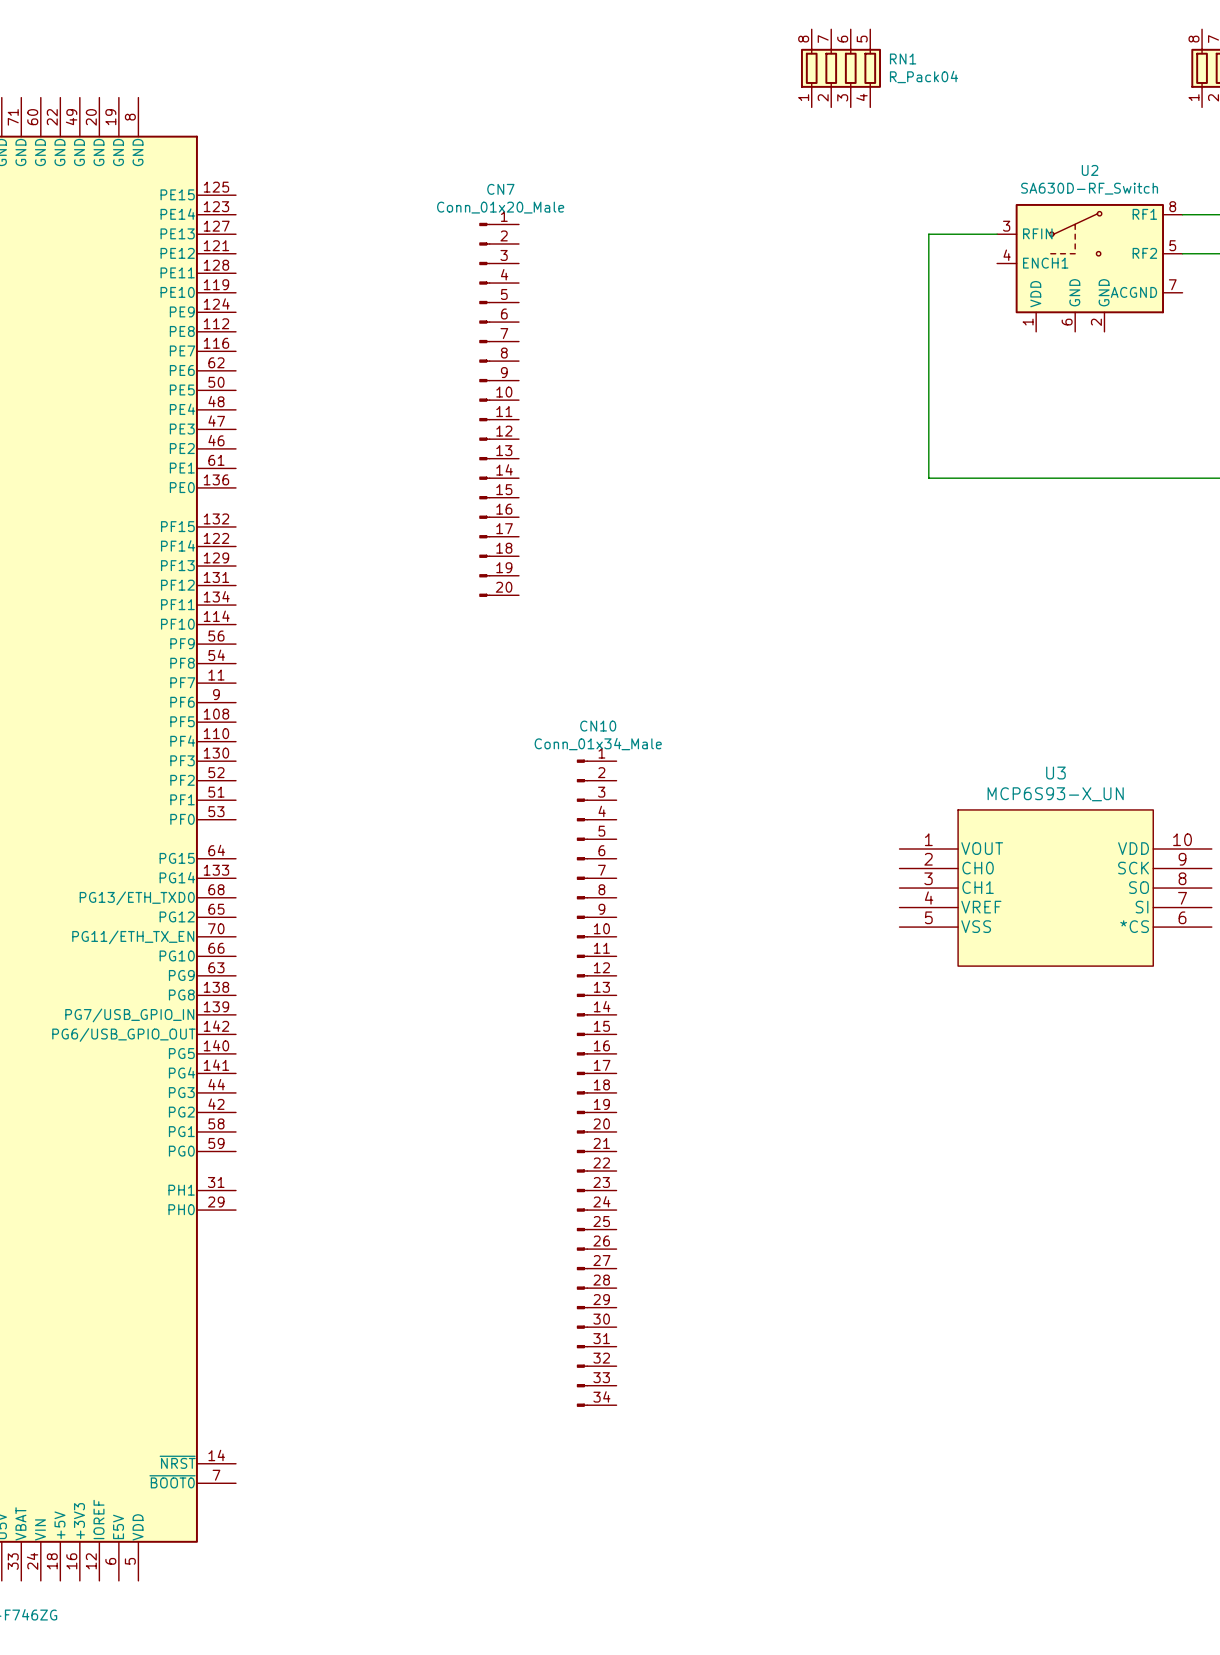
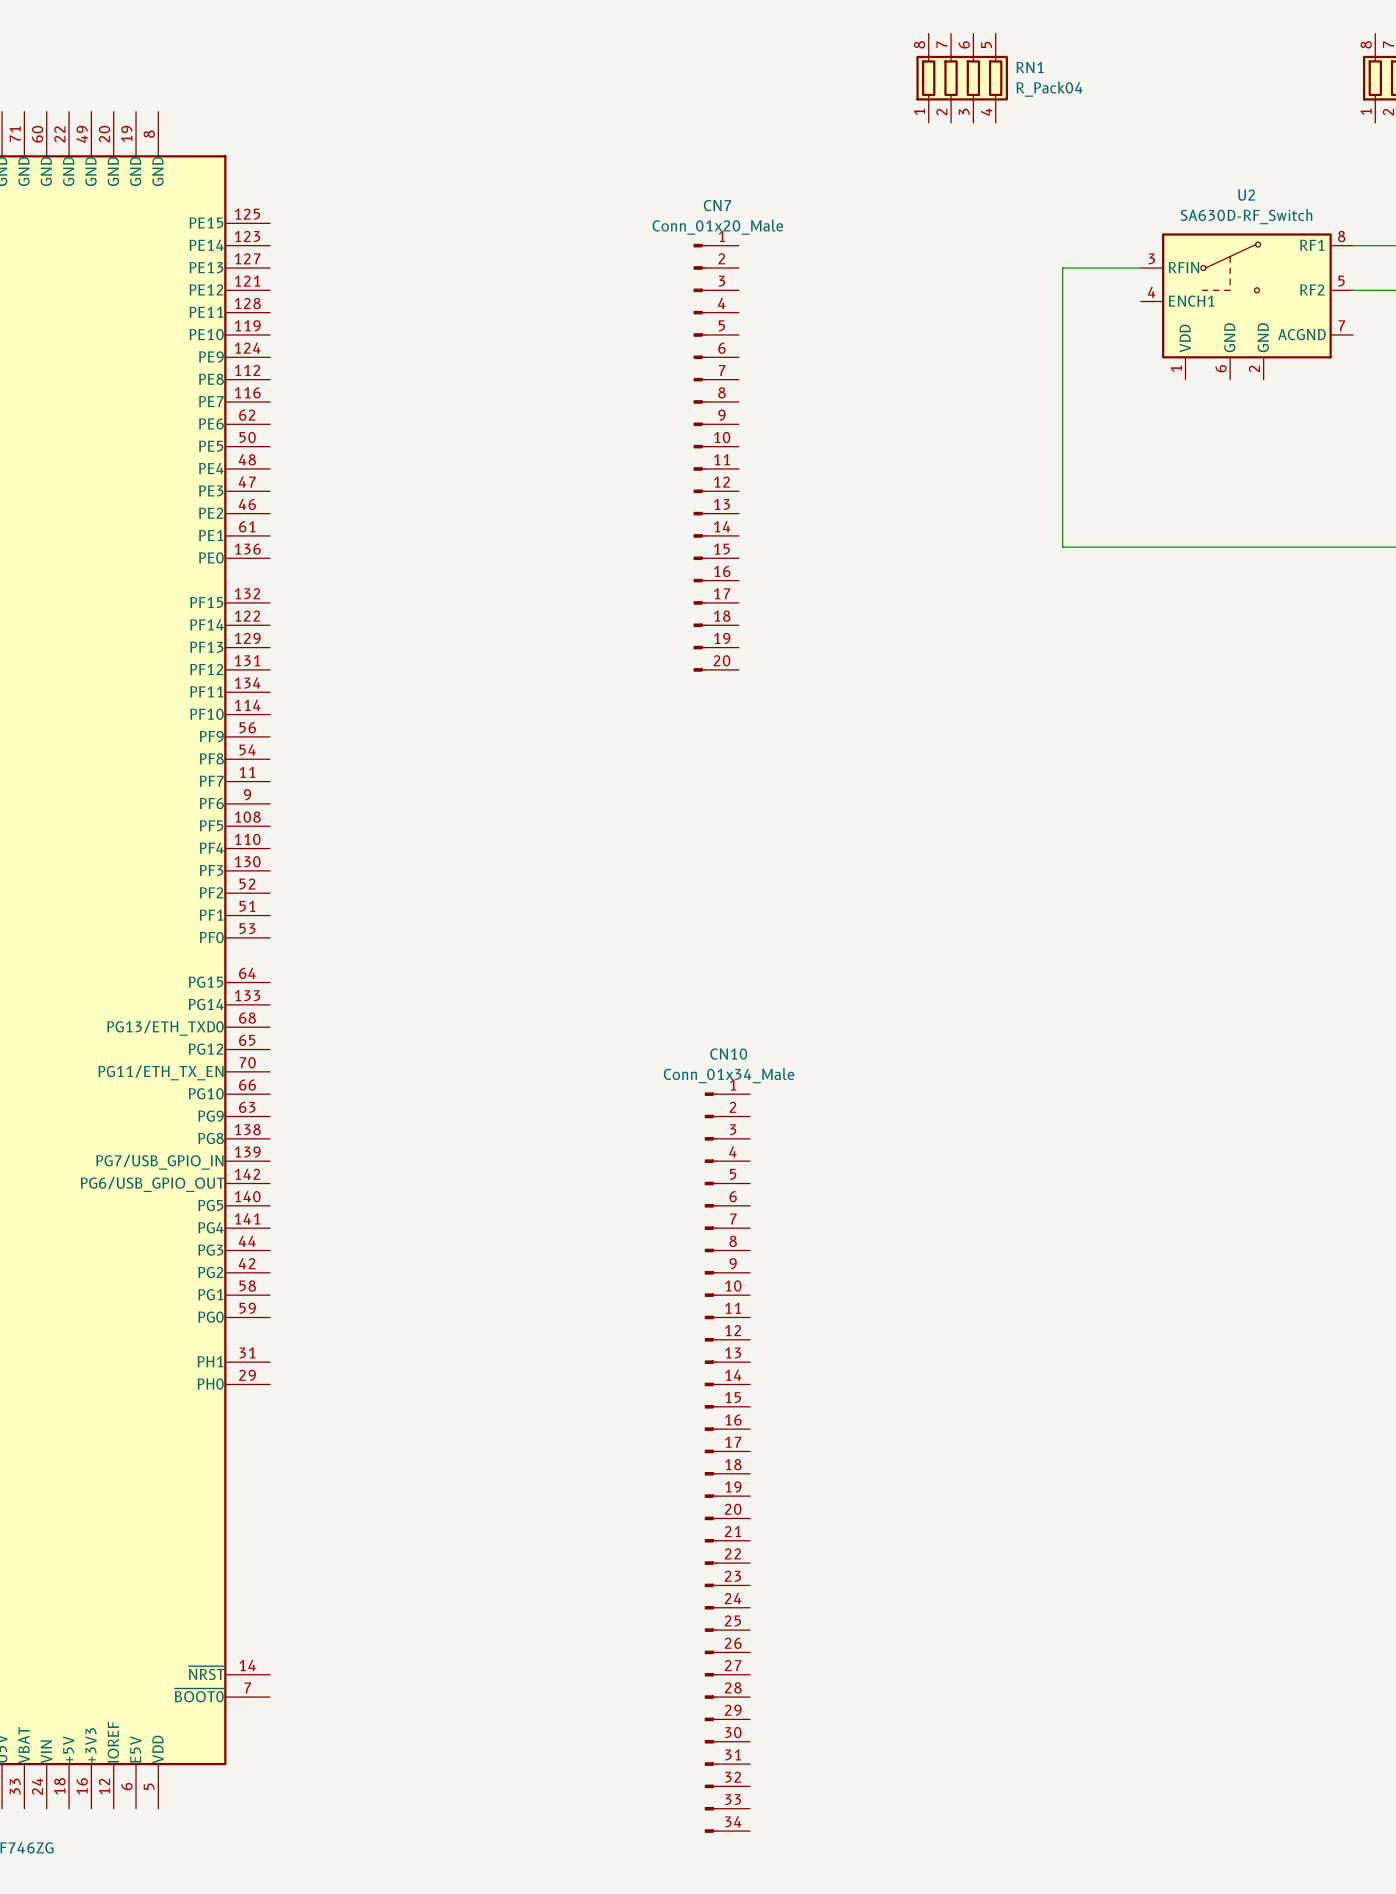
CN7 position: (499, 409) -> (716, 457)
U3: MCP6S93-X_UN (1055, 888) -> none
CN10 position: (596, 1083) -> (727, 1462)

